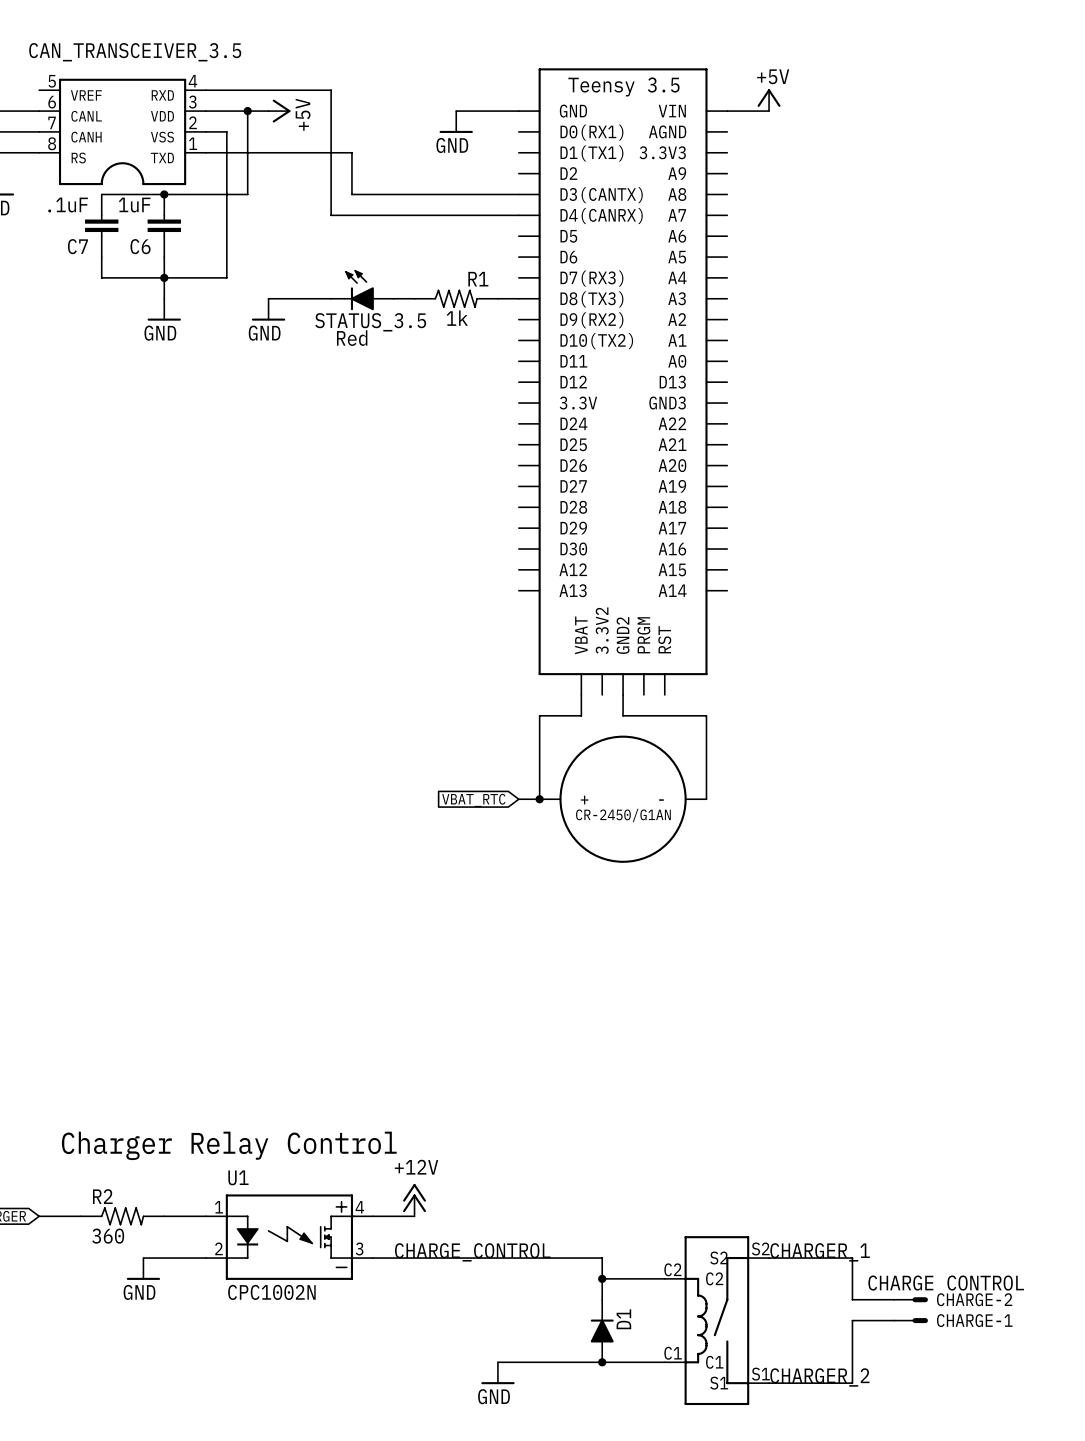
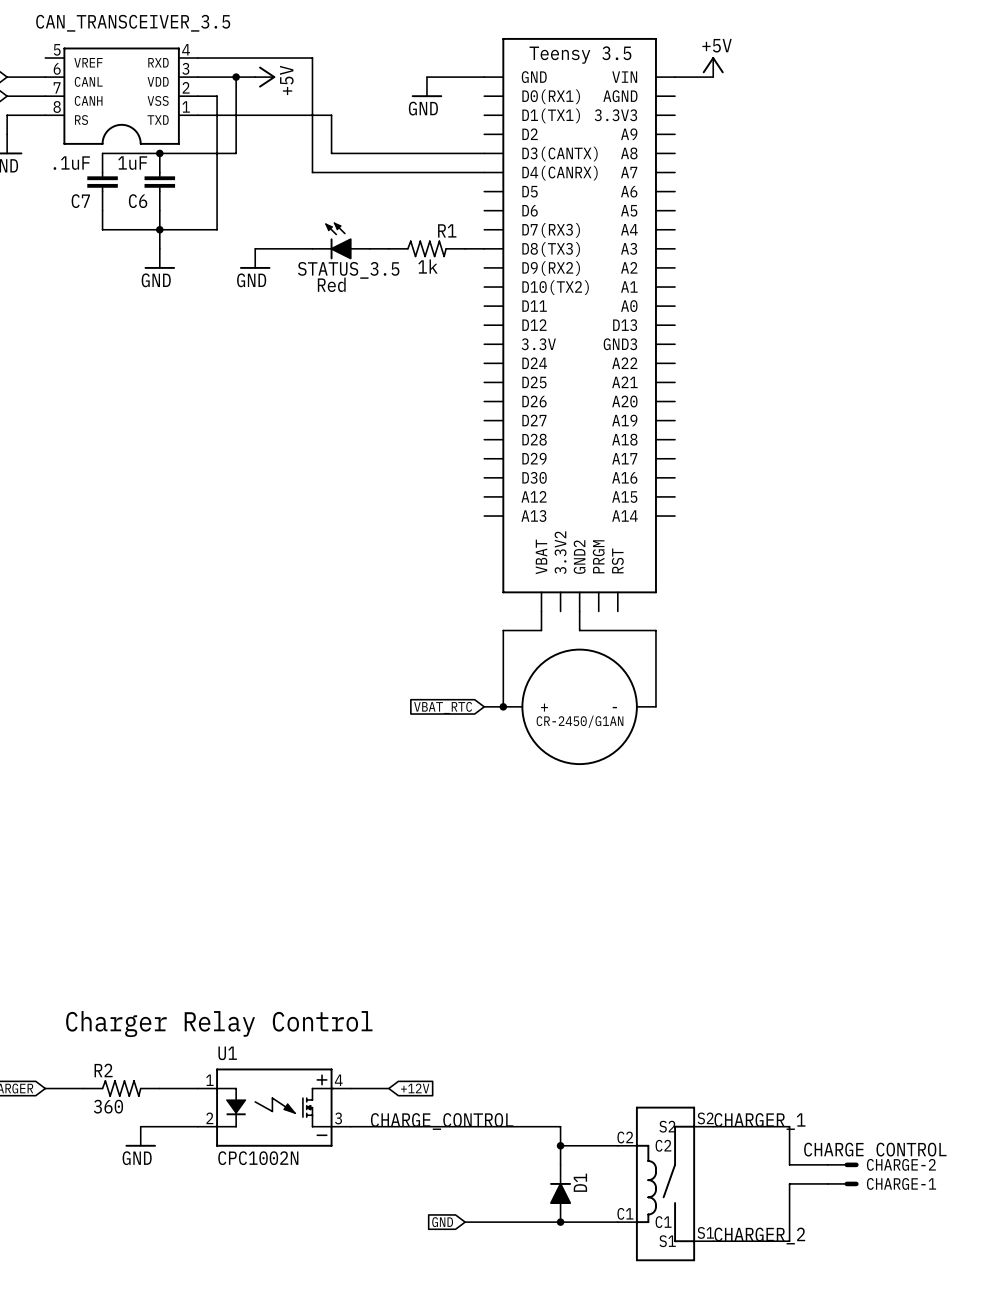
power symbol: +12V (414, 1200) -> none
global label: none -> +12V (415, 1088)
global label: none -> GND (442, 1222)
power symbol: GND (497, 1373) -> none

